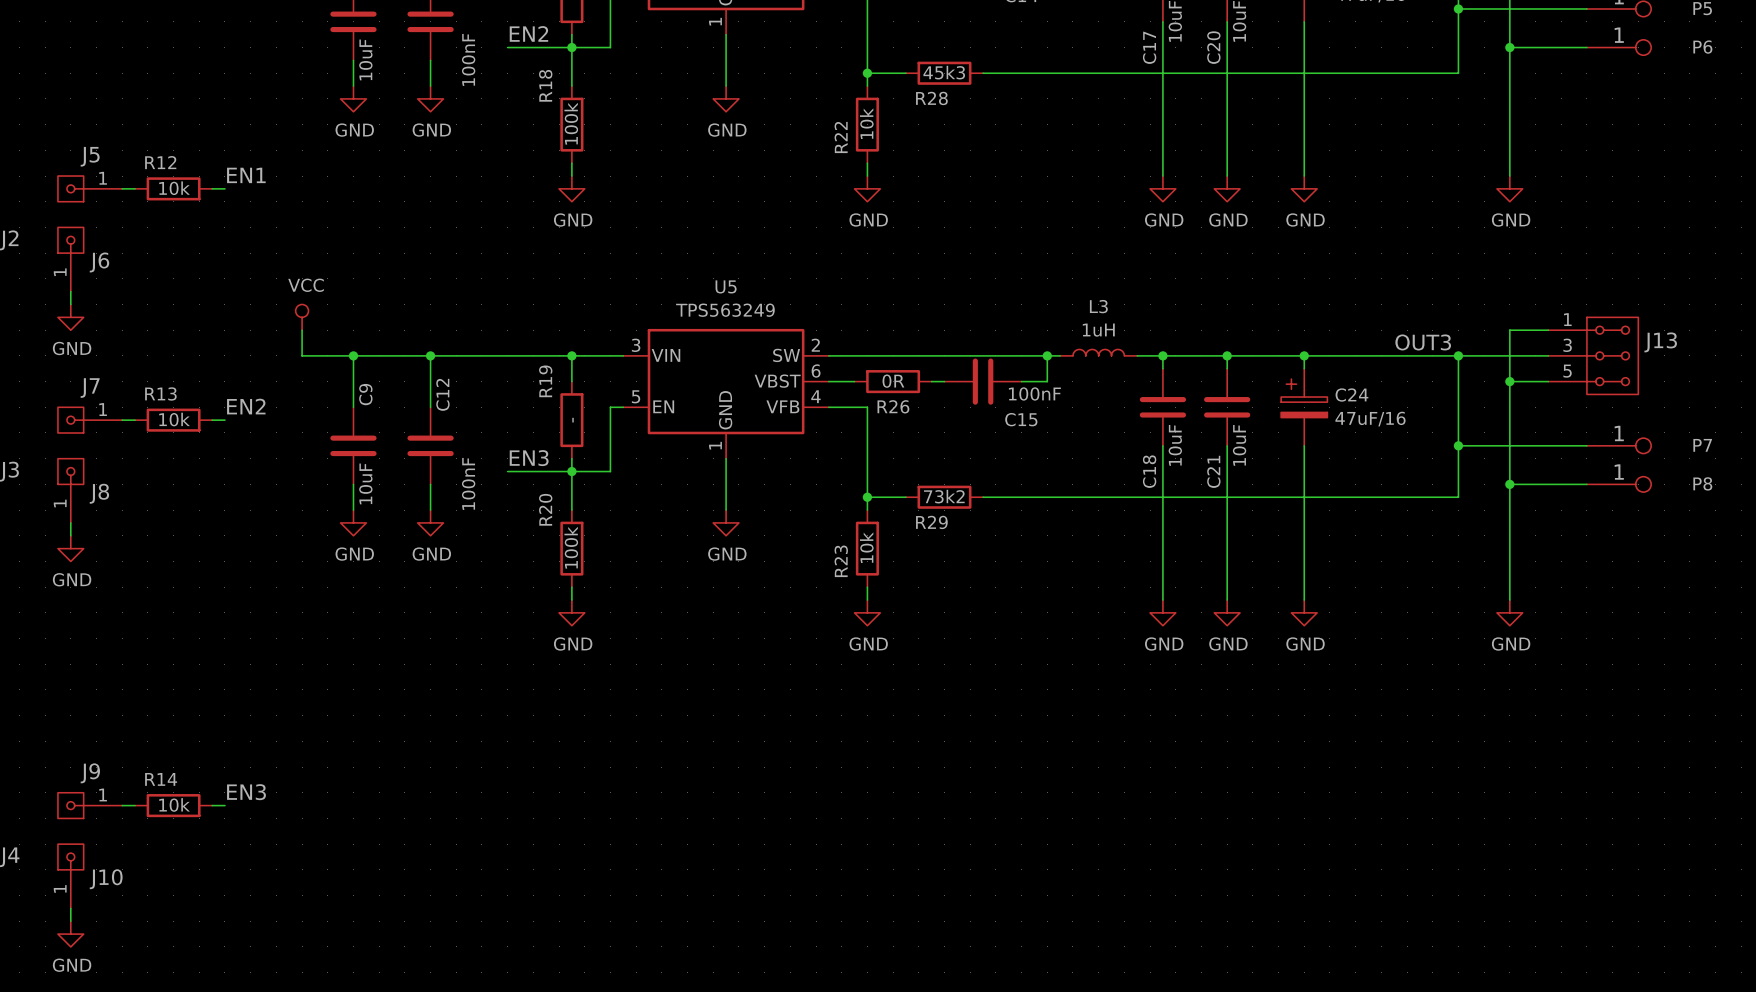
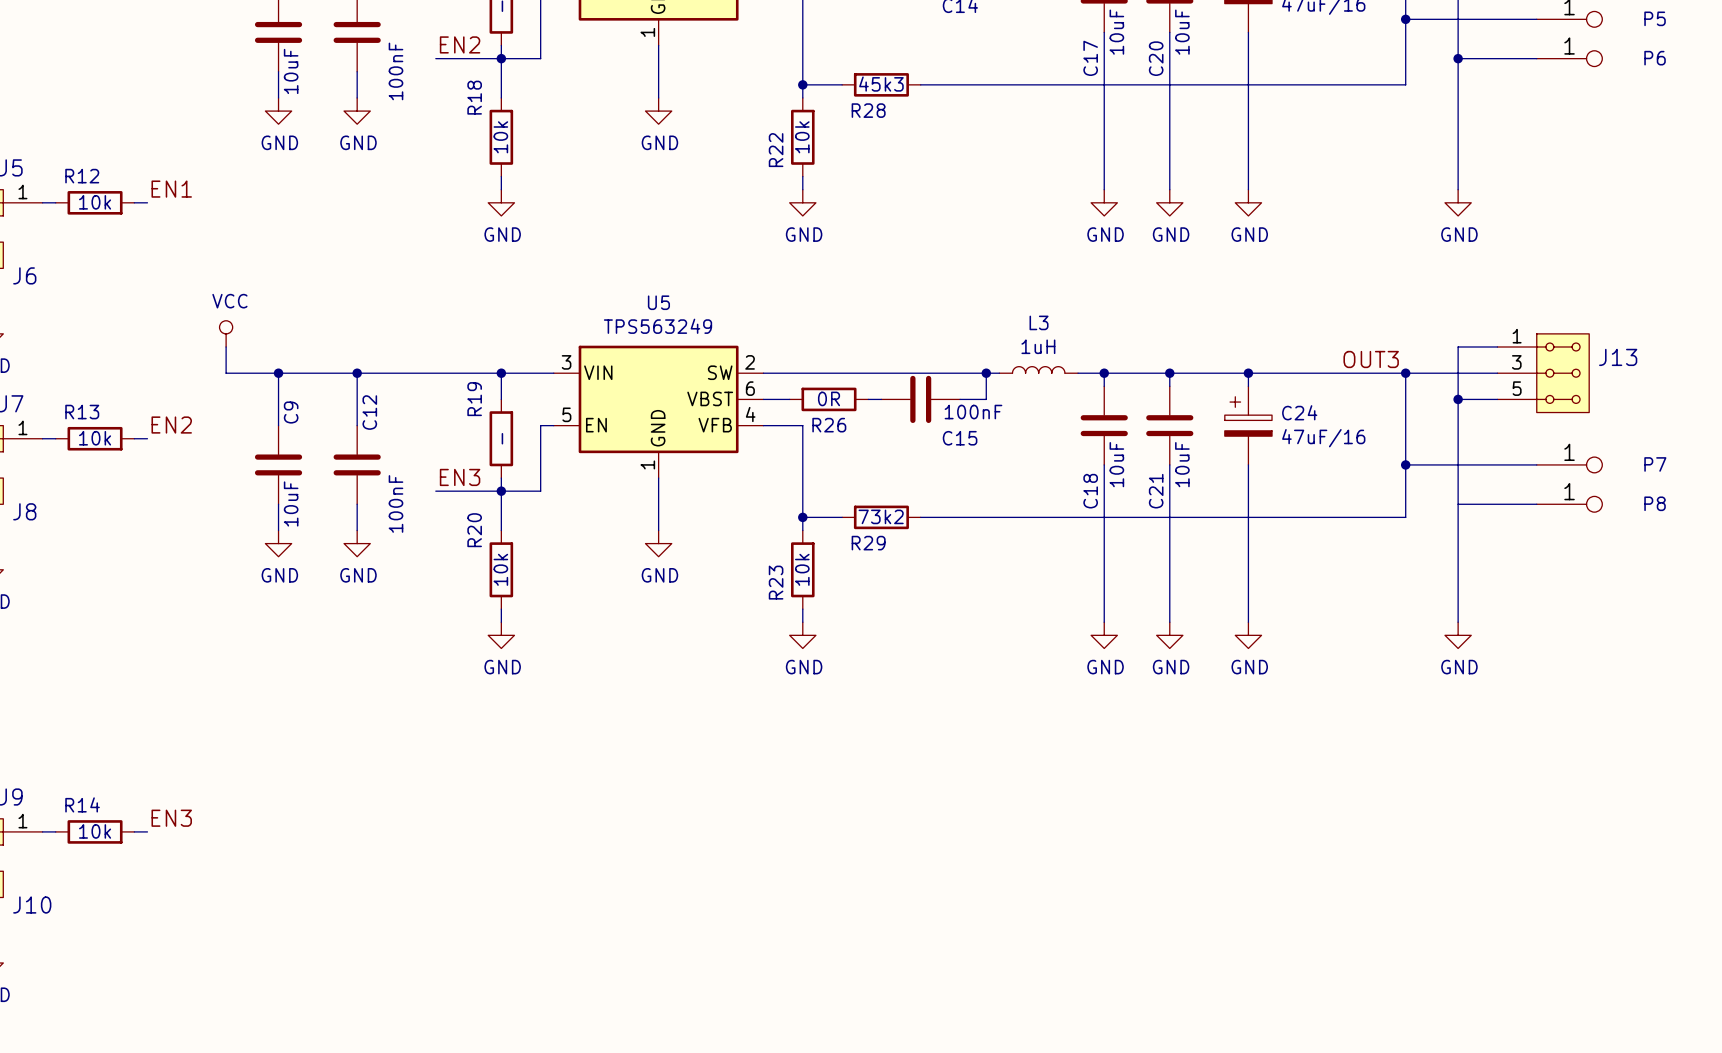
R18 value: 100k (571, 123) -> 10k (500, 137)
junction: (1509, 484) -> none
R20 value: 100k (571, 547) -> 10k (500, 569)

